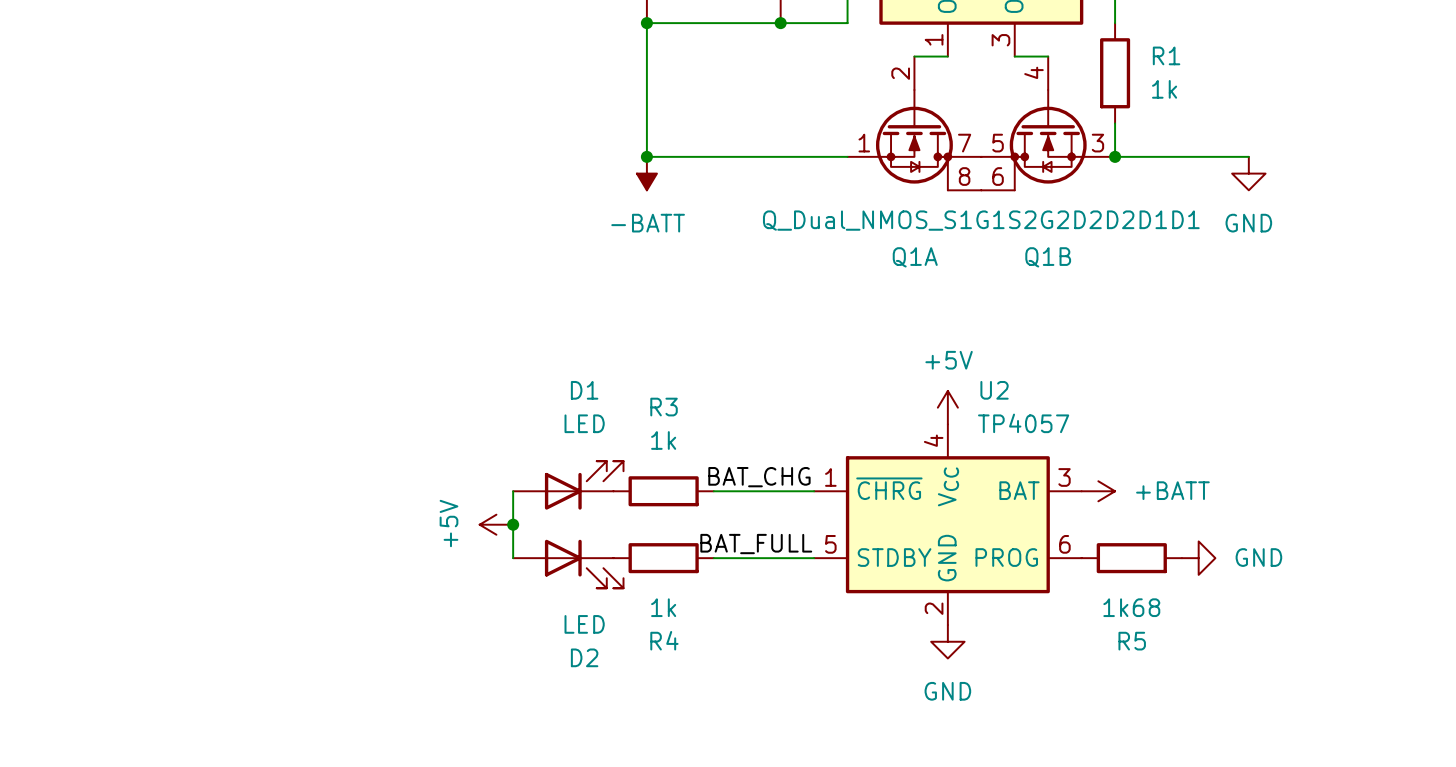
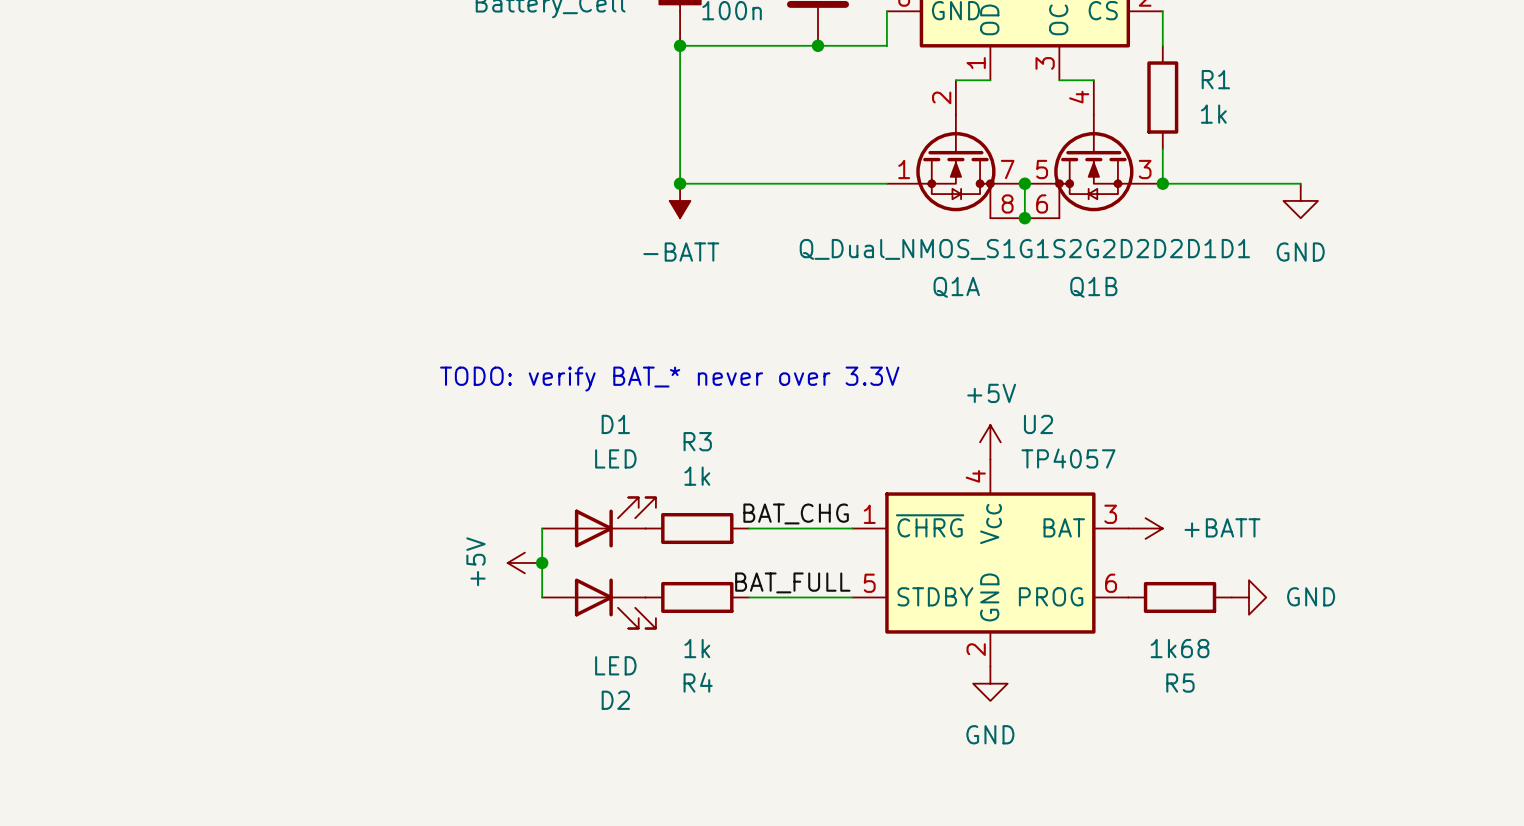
wire: none -> (1024, 183) (1024, 218)
junction: none -> (1024, 183)
junction: none -> (1024, 218)
text: none -> TODO: verify BAT_* never over 3.3V (669, 379)

